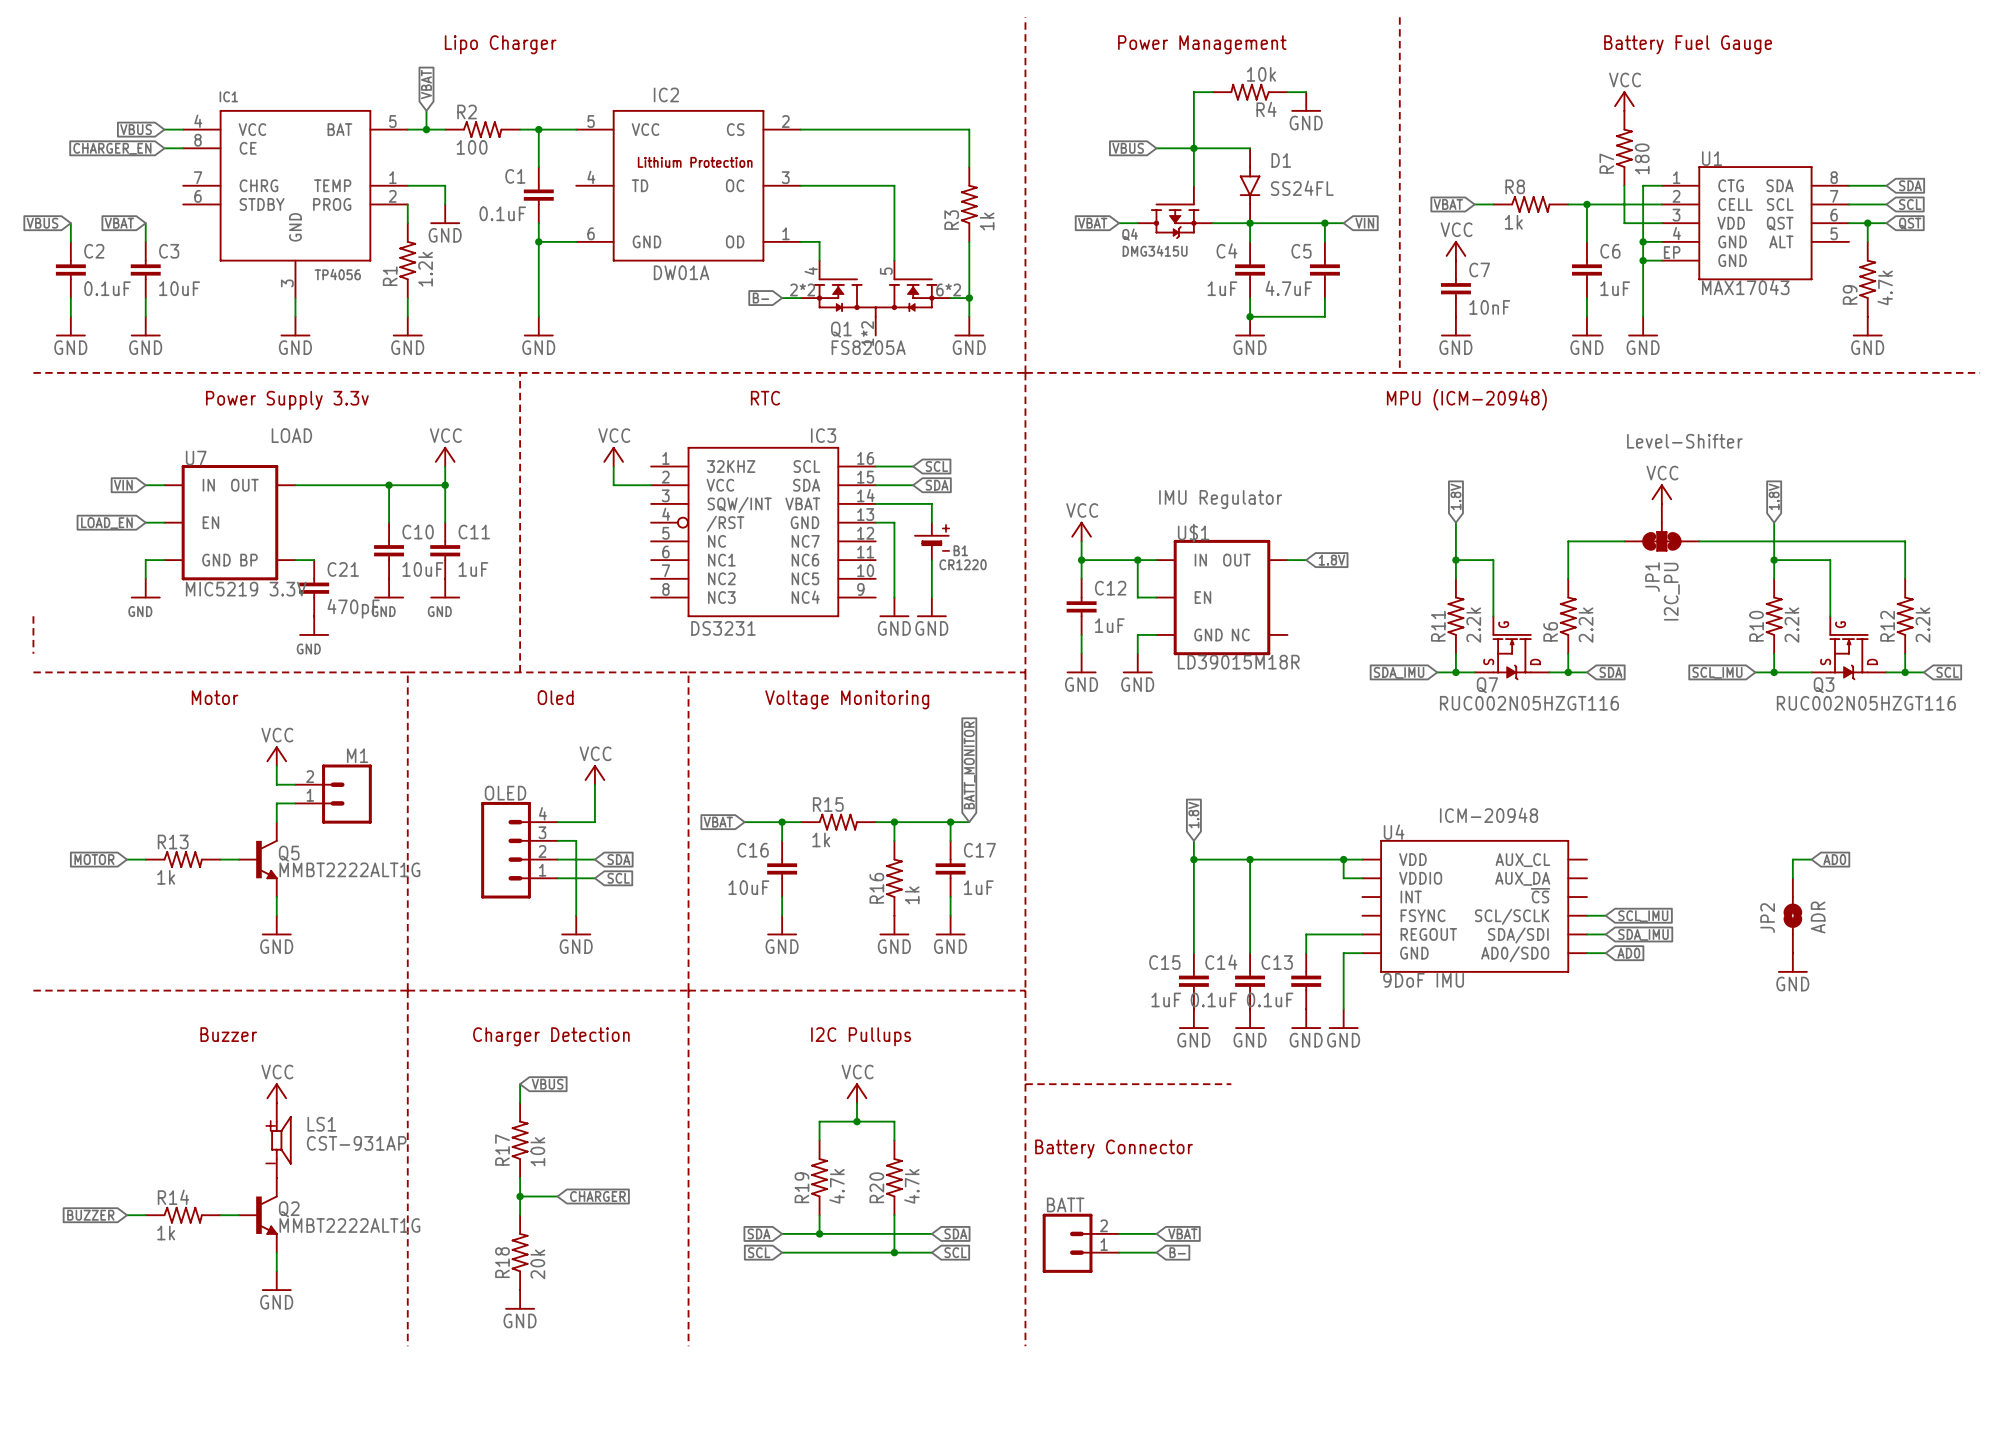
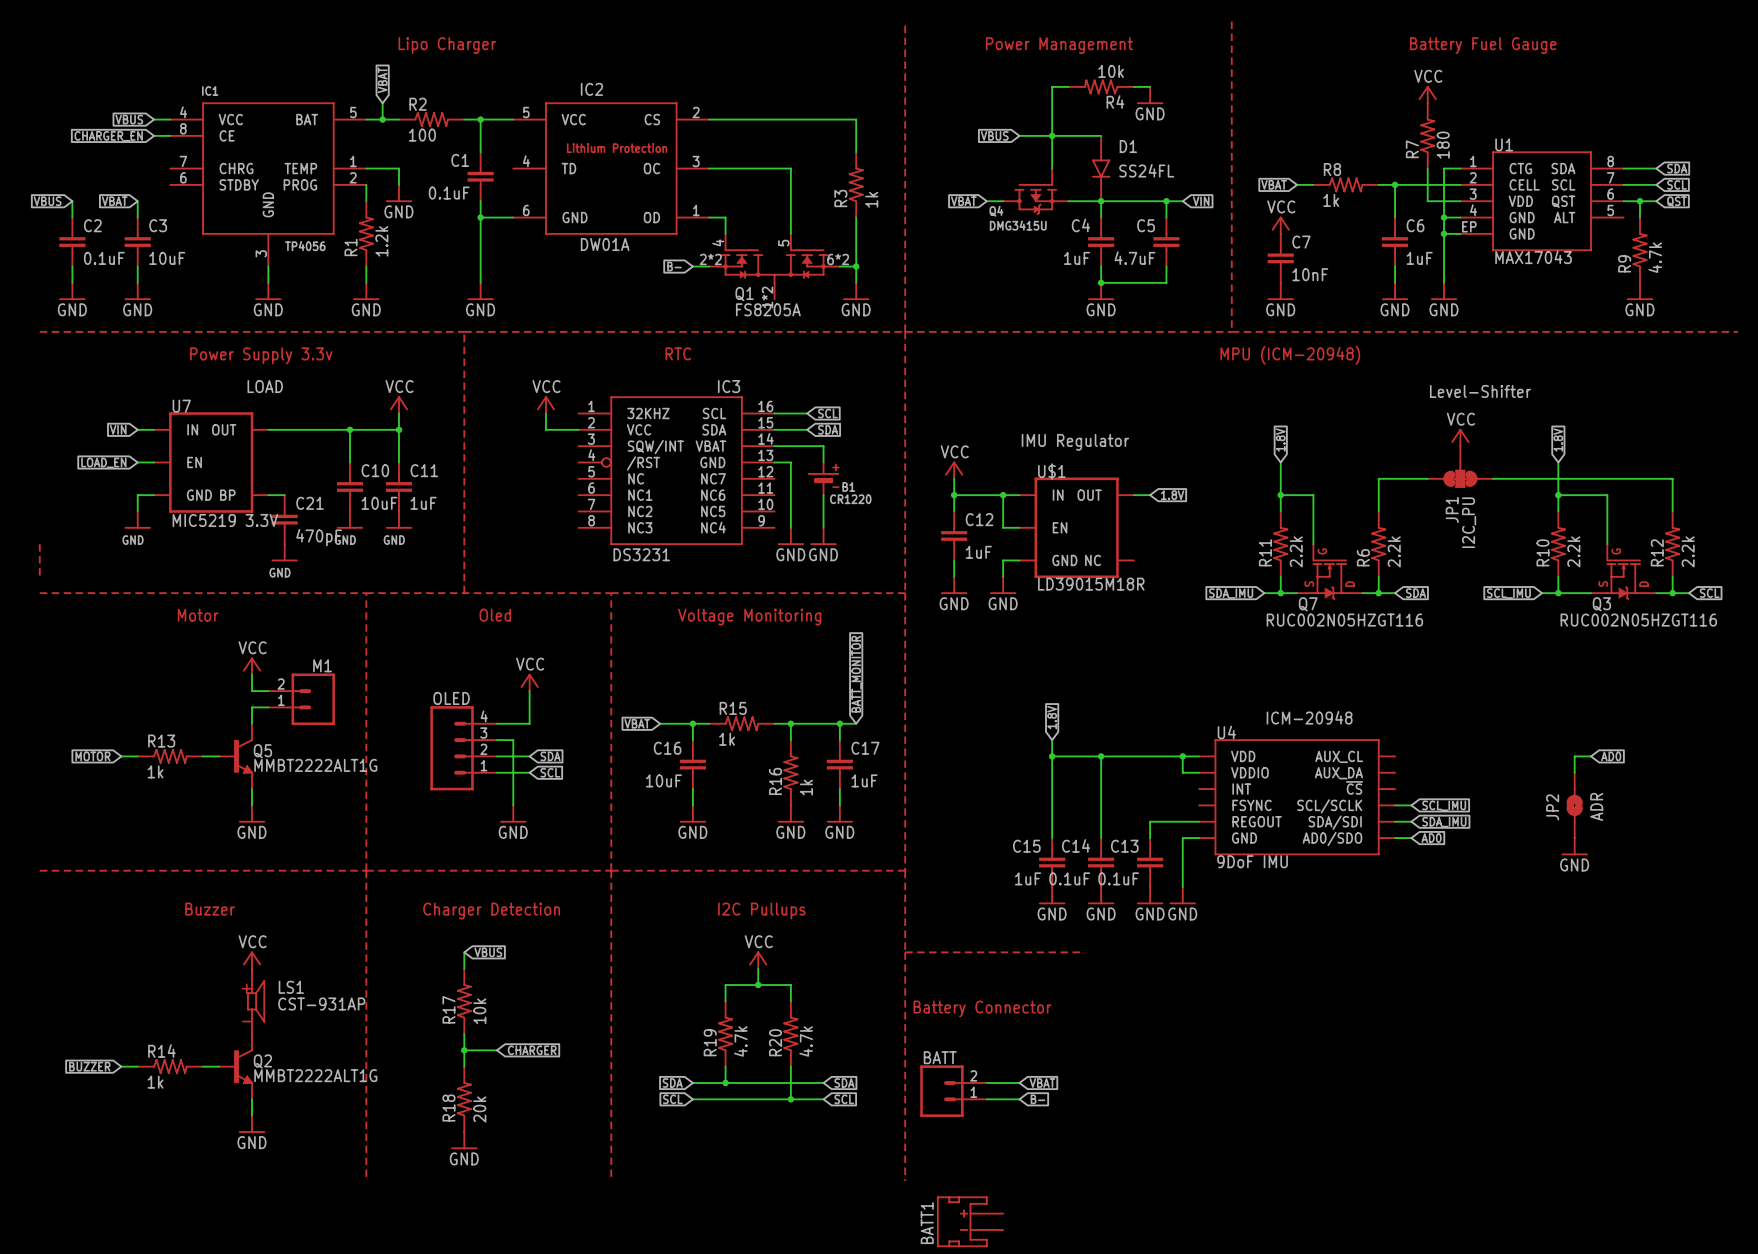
BATT1: none -> (970, 1221)

